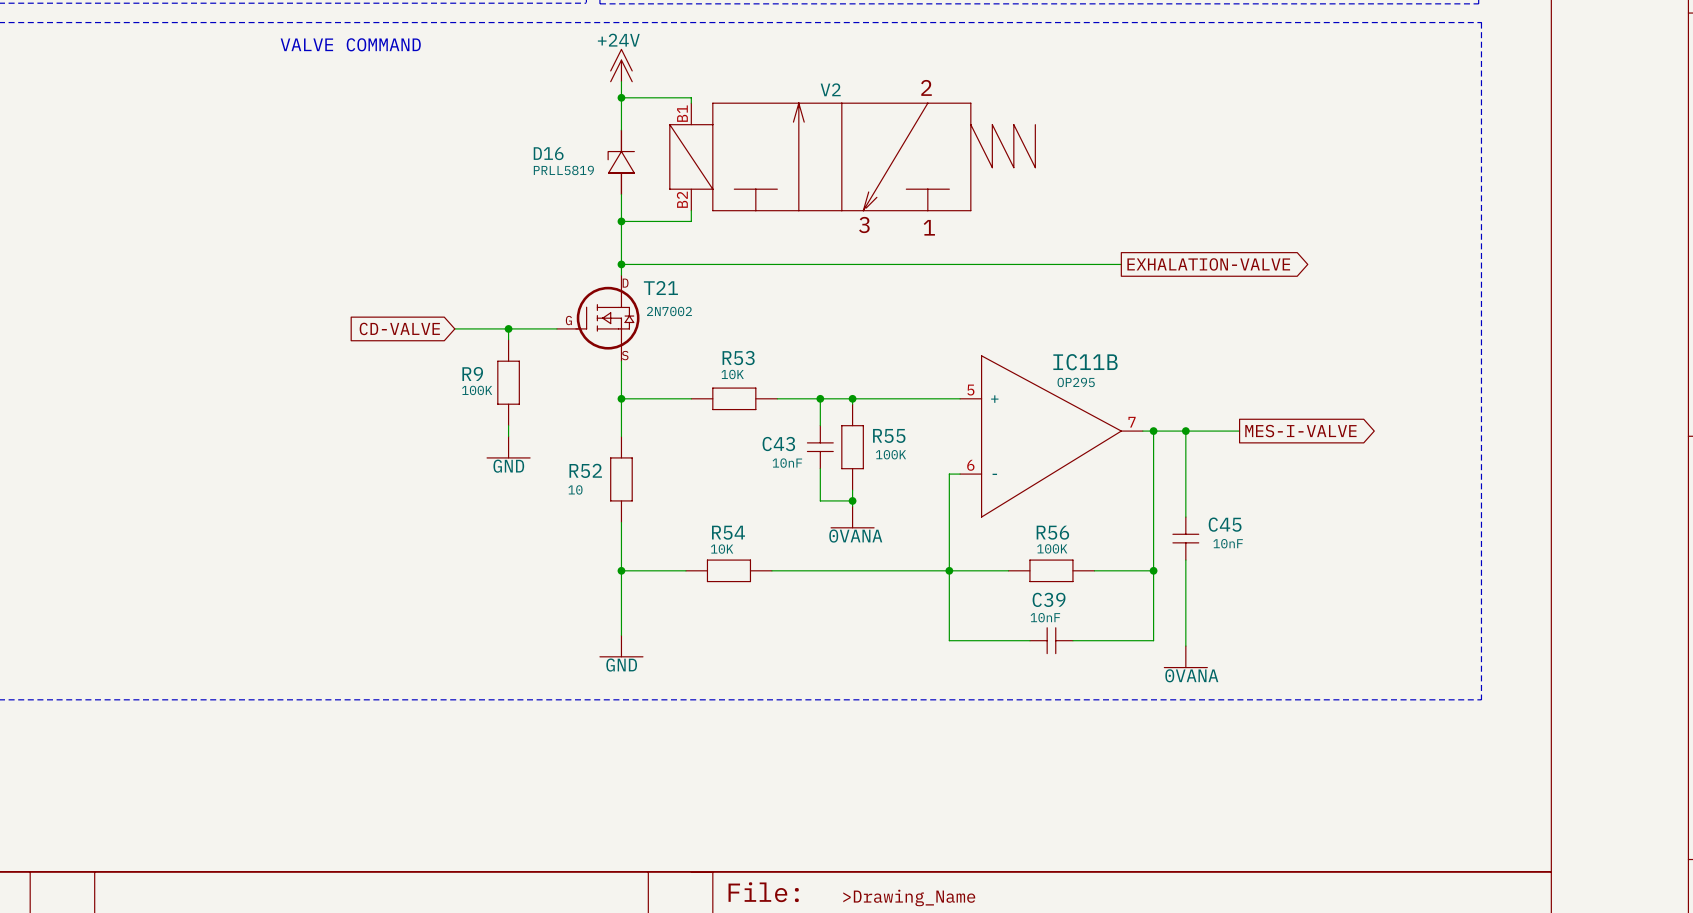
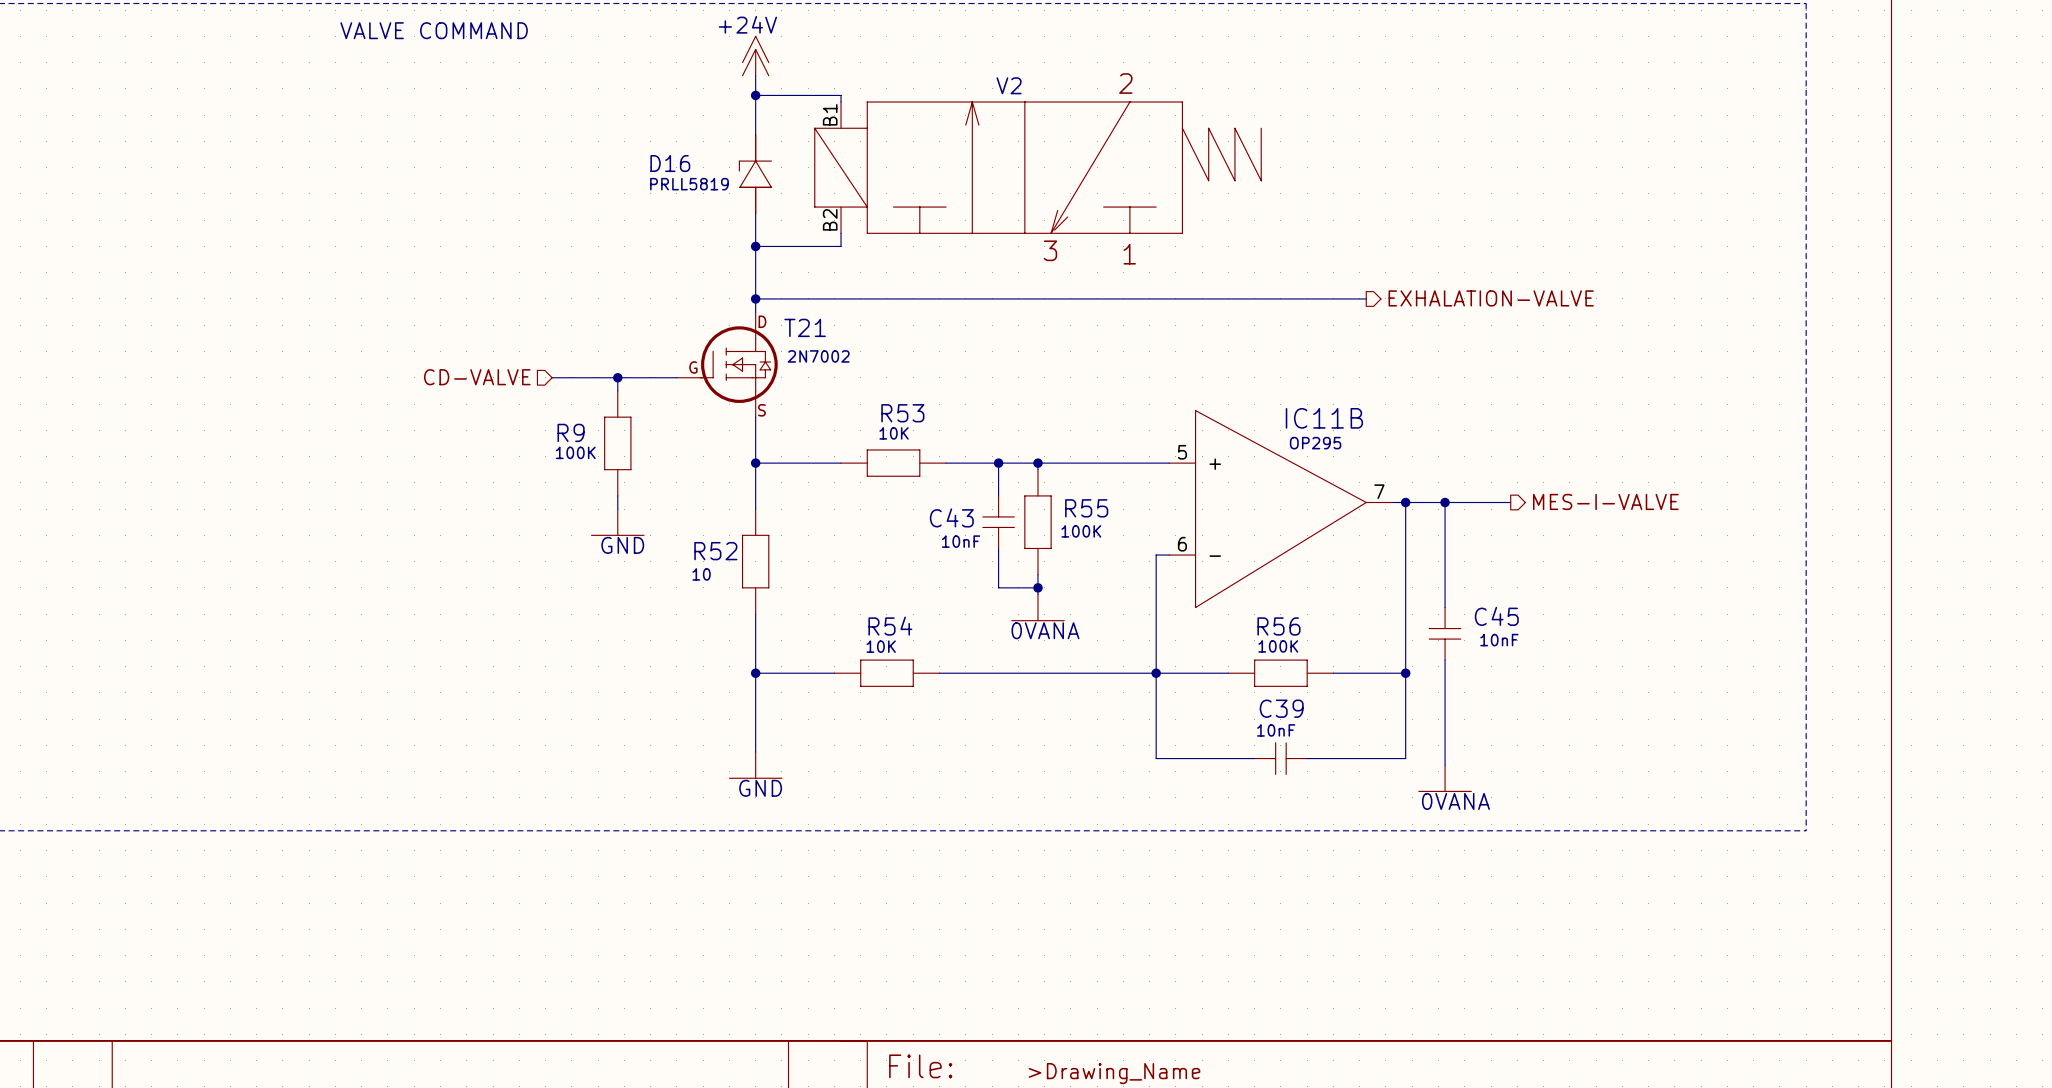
hierarchical label: none -> EXHALATION-VALVE (1491, 298)
global label: EXHALATION-VALVE (1208, 264) -> none
hierarchical label: none -> CD-VALVE (477, 377)
global label: CD-VALVE (399, 328) -> none
hierarchical label: none -> MES-I-VALVE (1605, 501)
global label: MES-I-VALVE (1300, 431) -> none

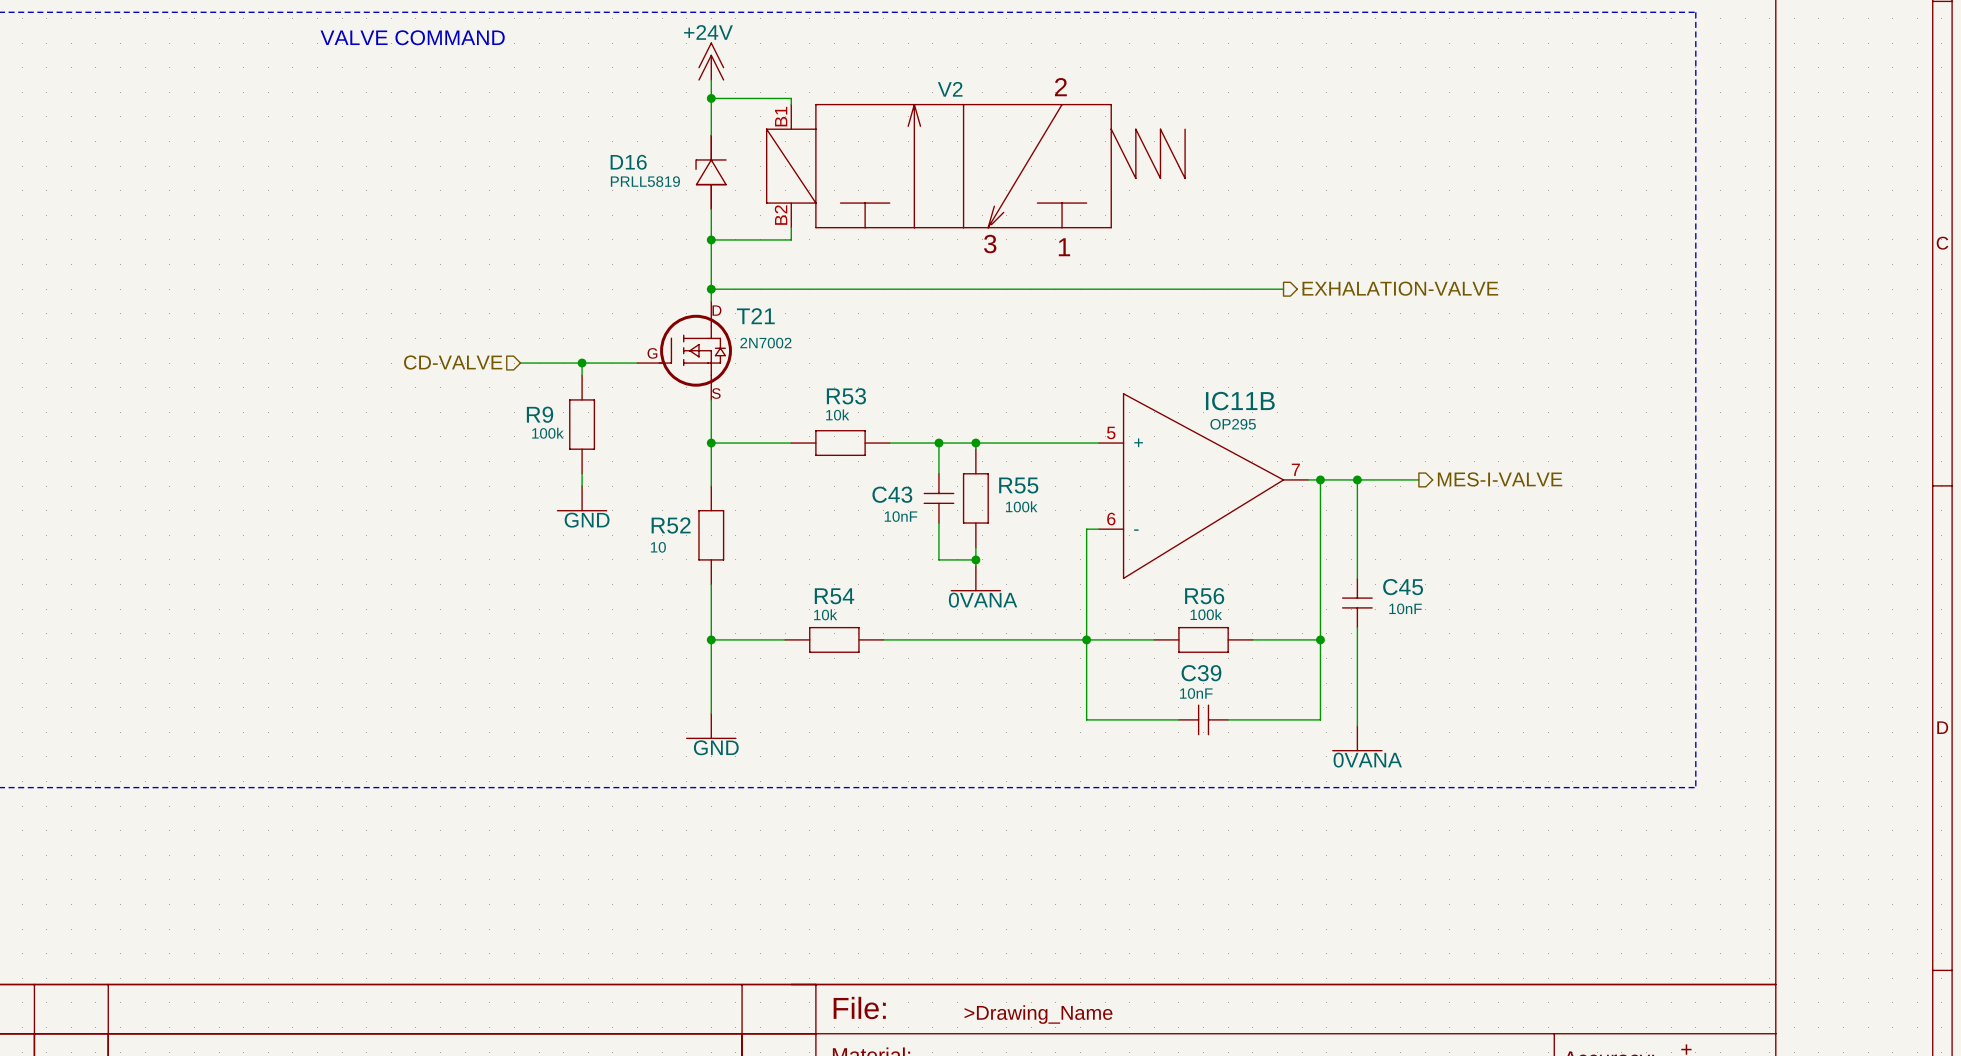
R53 value: 10K (894, 433) -> 10k (837, 414)
R9 value: 100K (575, 452) -> 100k (547, 433)
R55 value: 100K (1081, 531) -> 100k (1021, 506)
R54 value: 10K (881, 646) -> 10k (825, 614)
R56 value: 100K (1278, 646) -> 100k (1206, 614)

